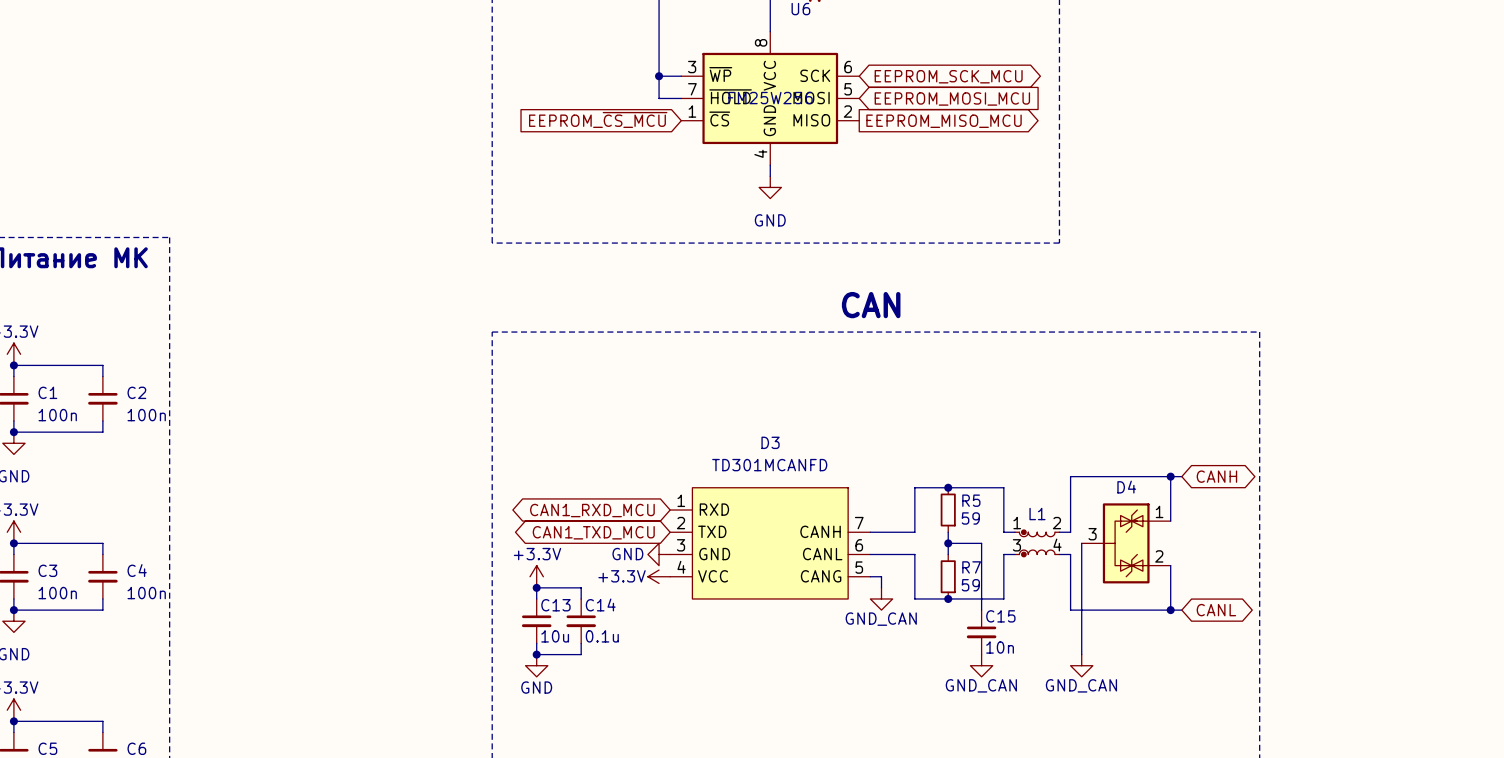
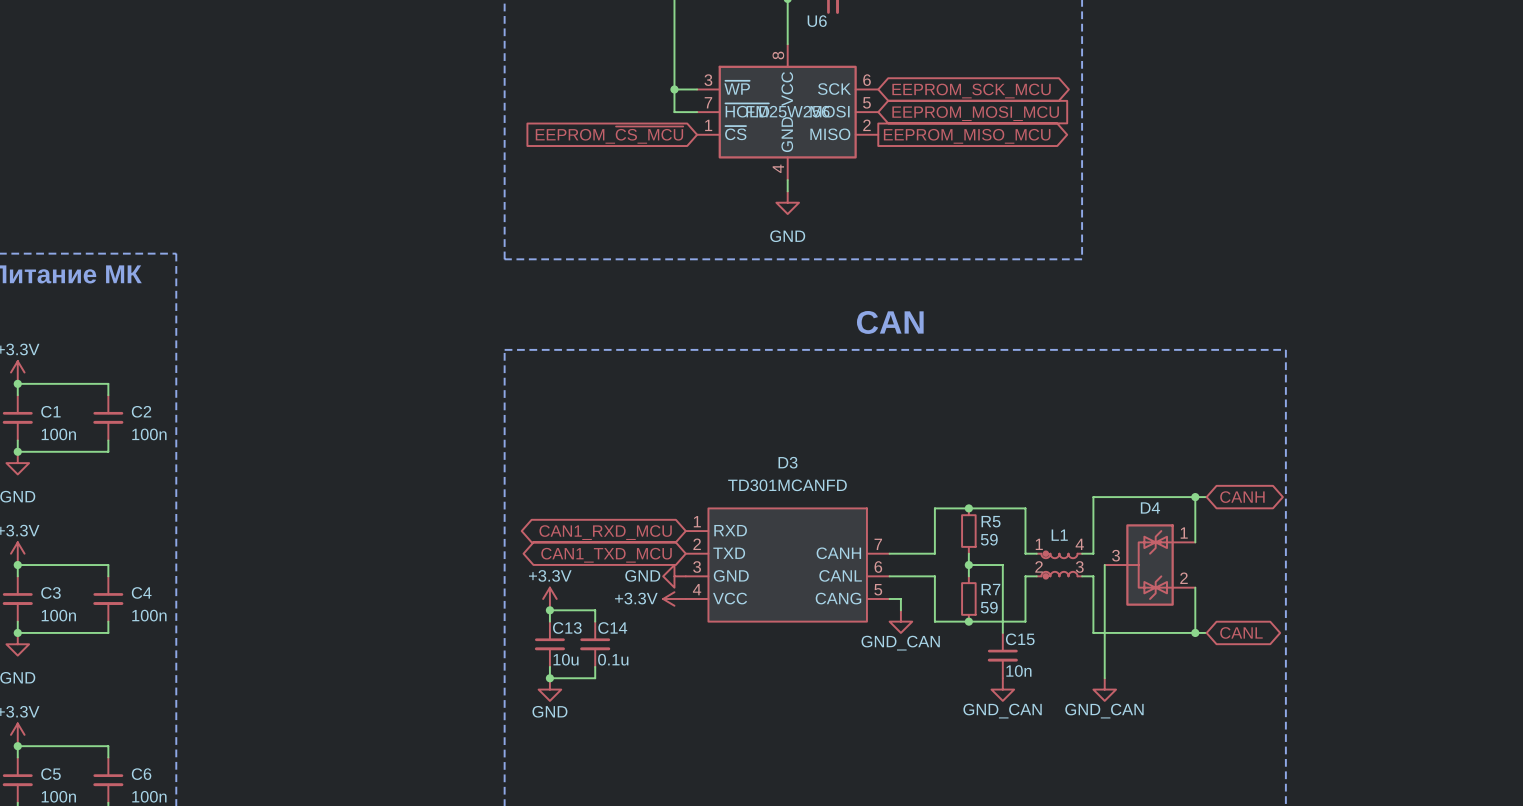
L1 pin number: 2 (1056, 523) -> 4 (1079, 544)
L1 pin number: 3 (1016, 545) -> 2 (1039, 566)
L1 pin number: 4 (1057, 545) -> 3 (1079, 567)

